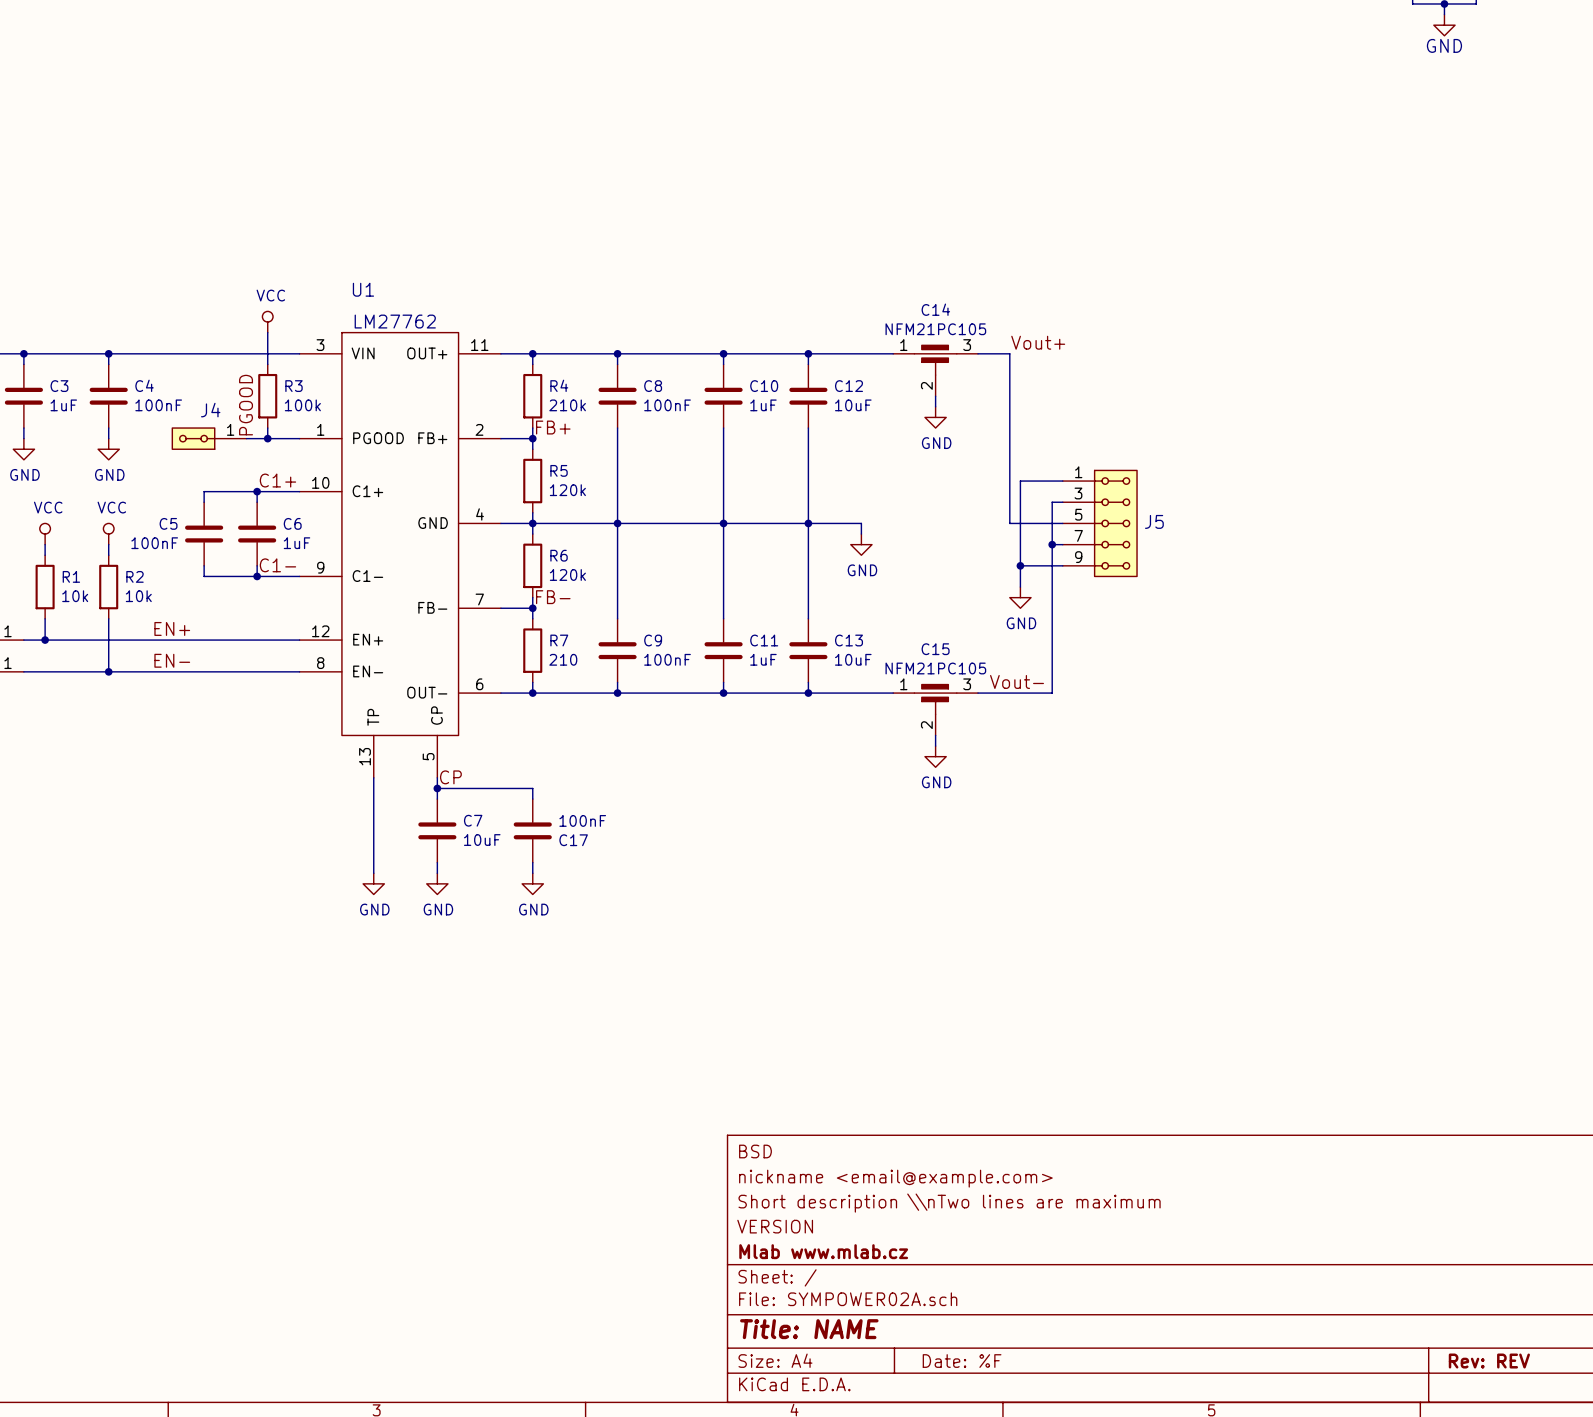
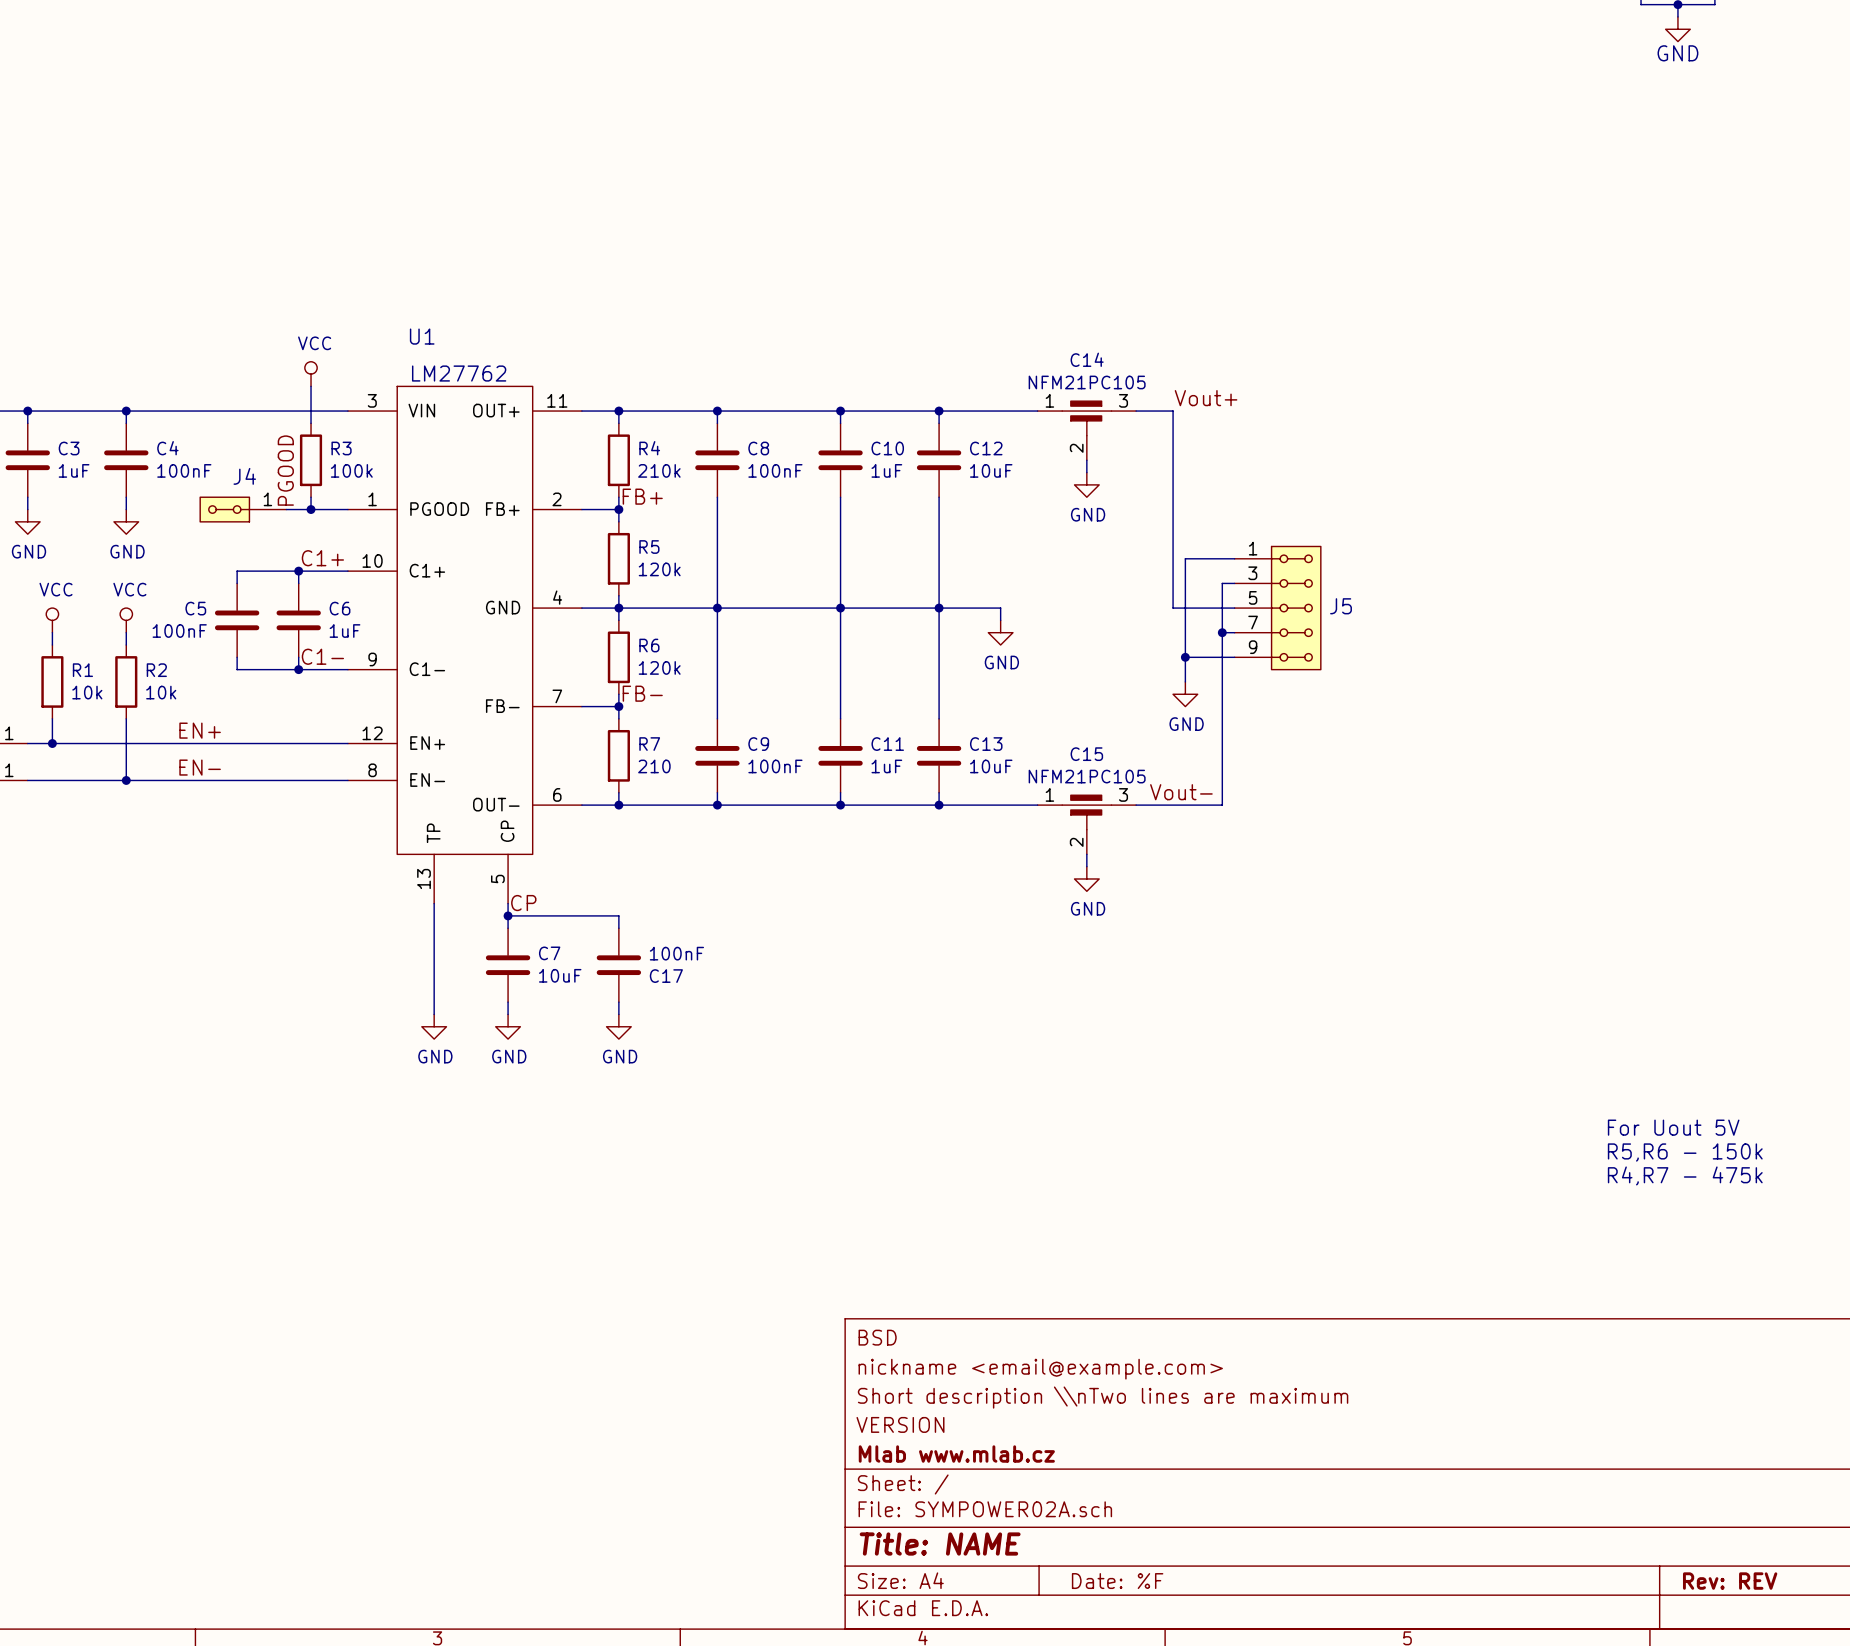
text: none -> For Uout 5V (1673, 1127)
text: none -> R5,R6 - 150k (1685, 1152)
text: none -> R4,R7 - 475k (1685, 1175)

